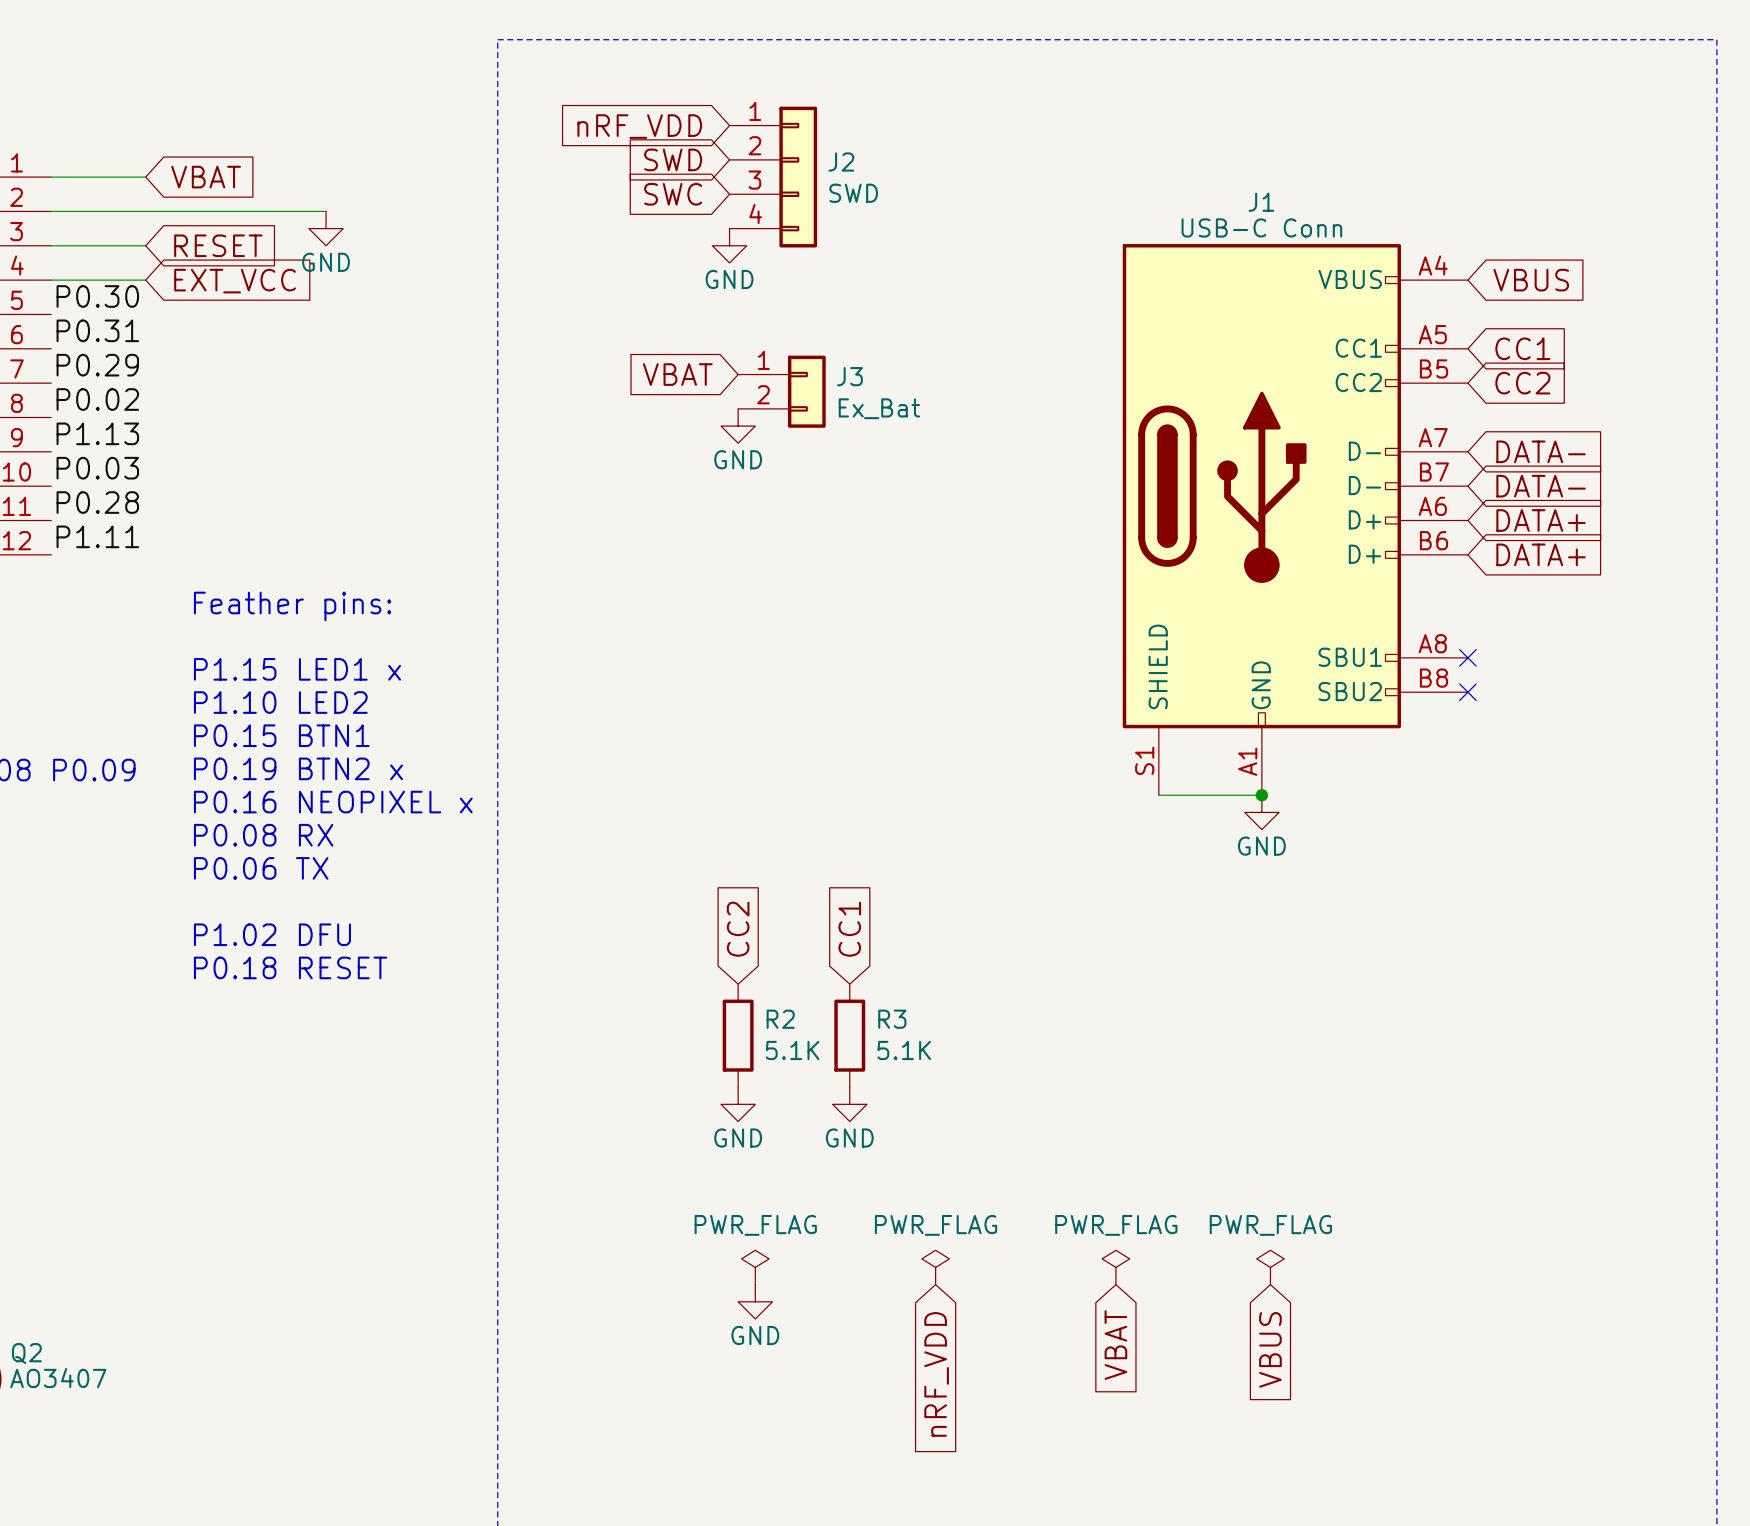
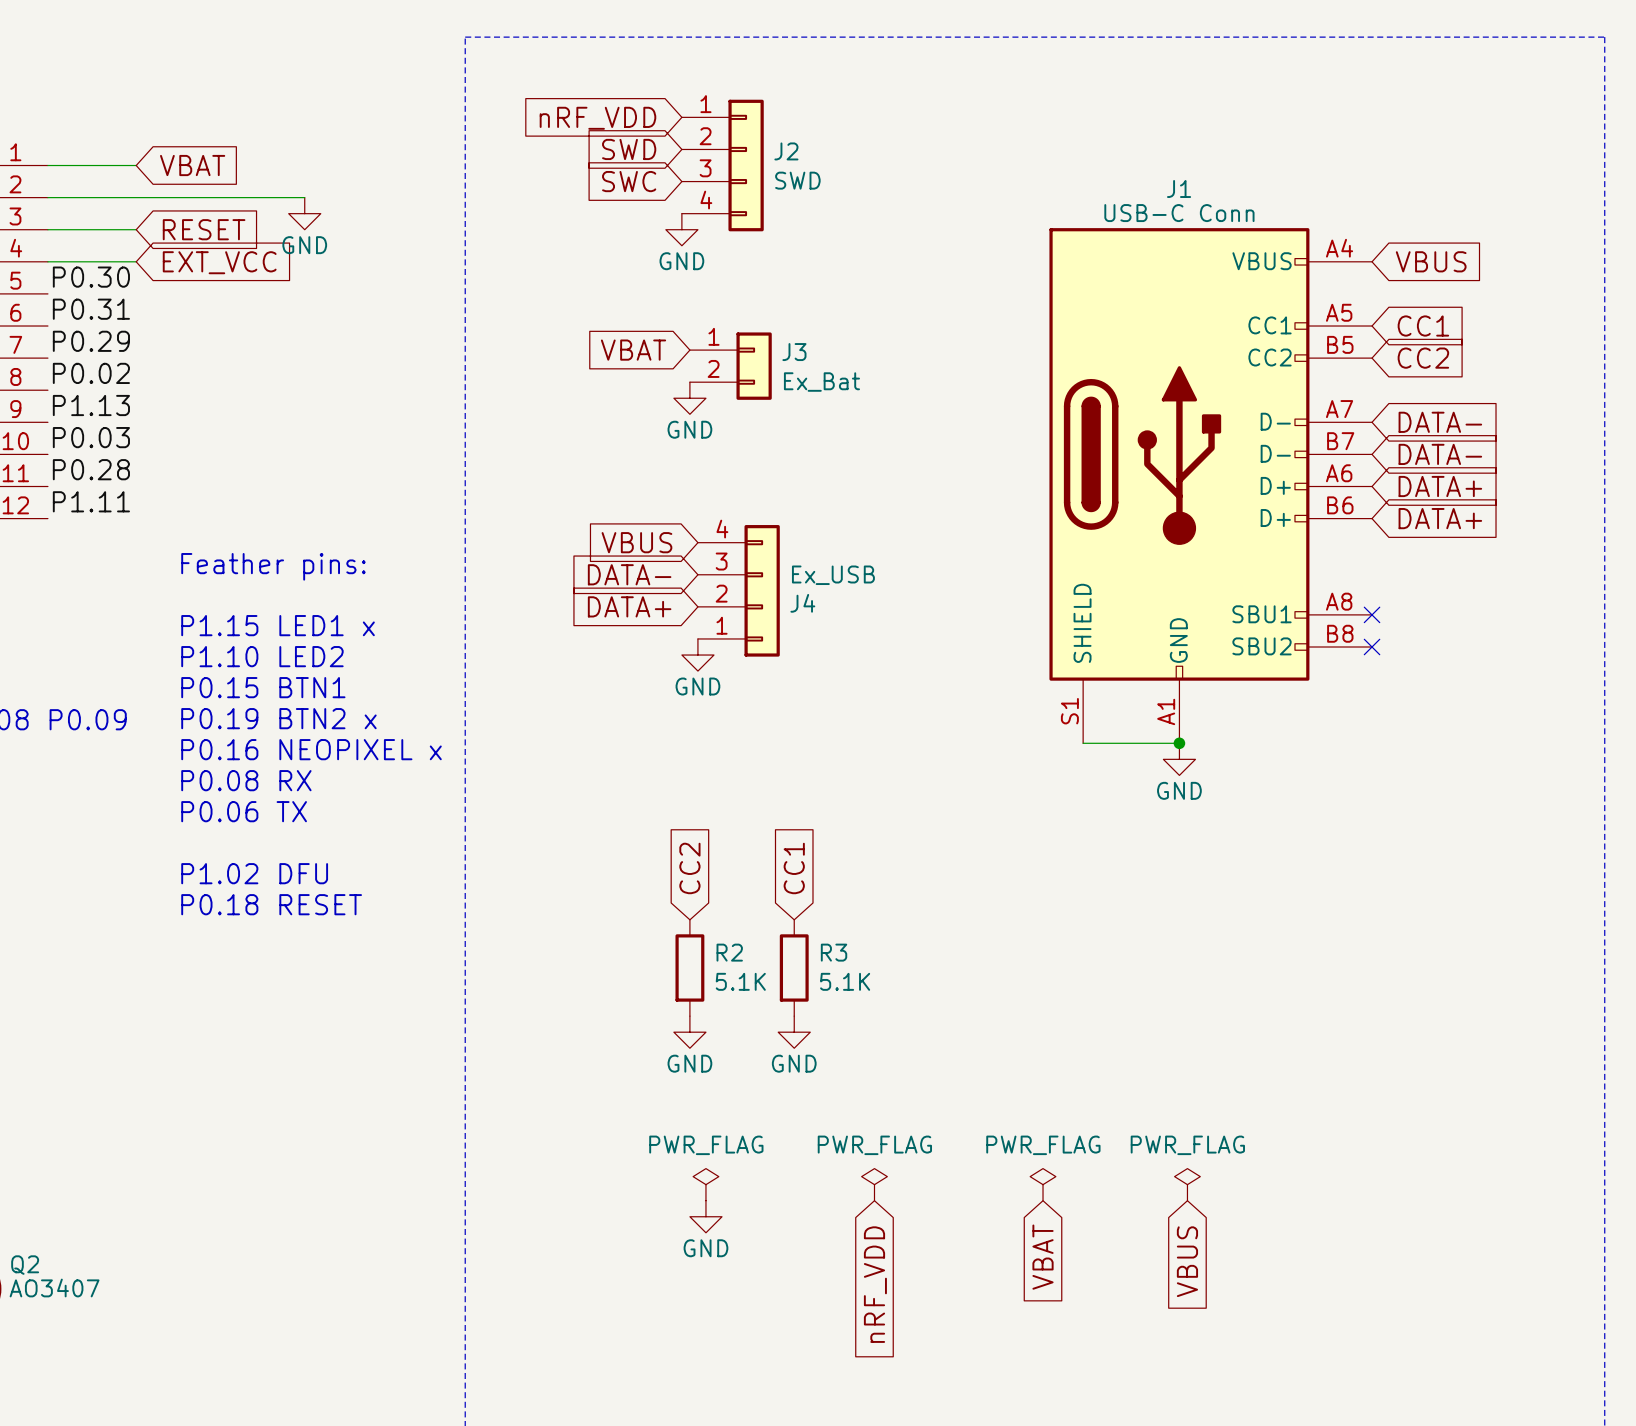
global label: none -> VBUS (636, 542)
global label: none -> DATA- (629, 574)
J4: none -> Ex_USB (738, 590)
global label: none -> DATA+ (629, 606)
power symbol: none -> GND (697, 655)

